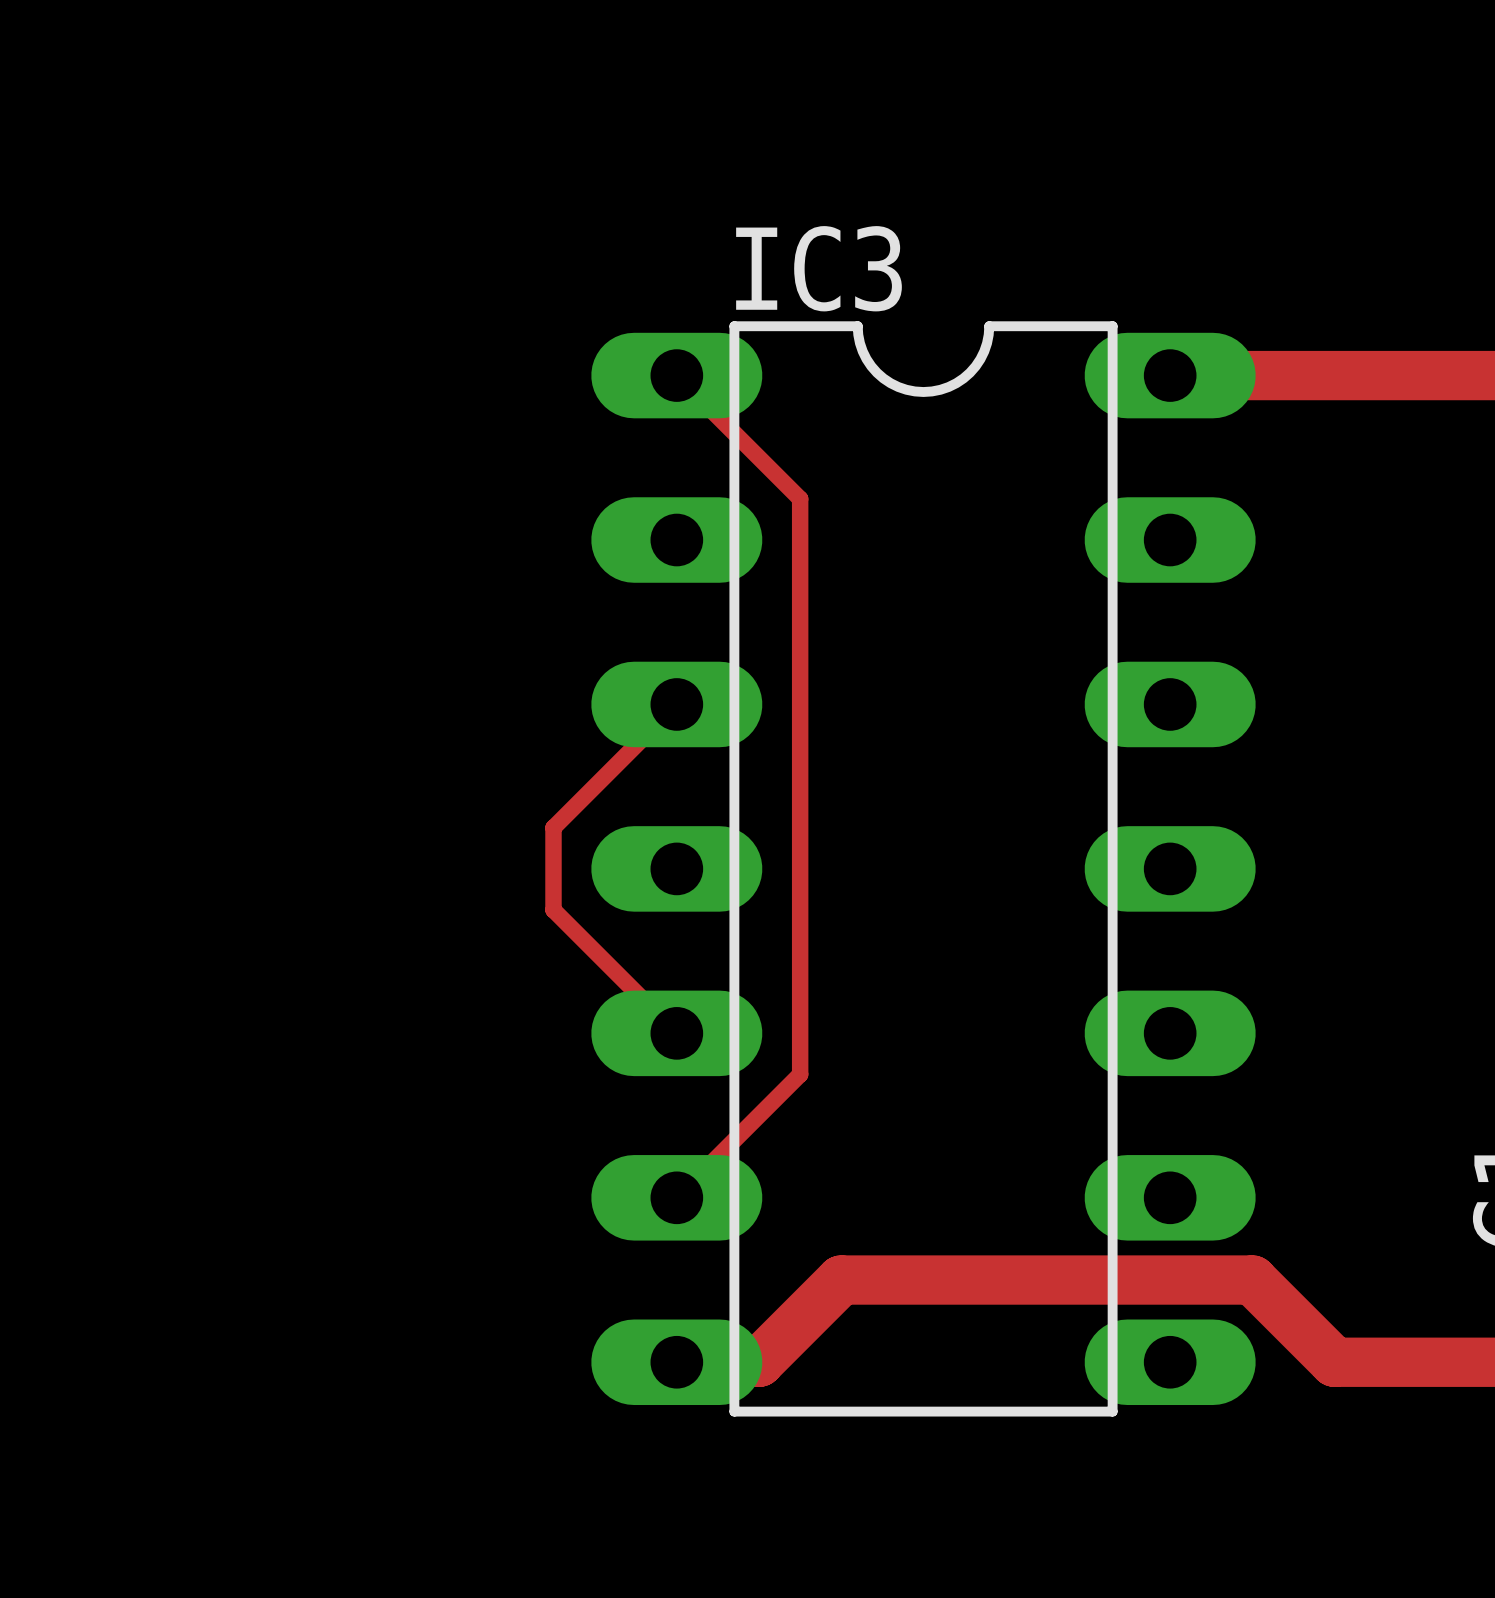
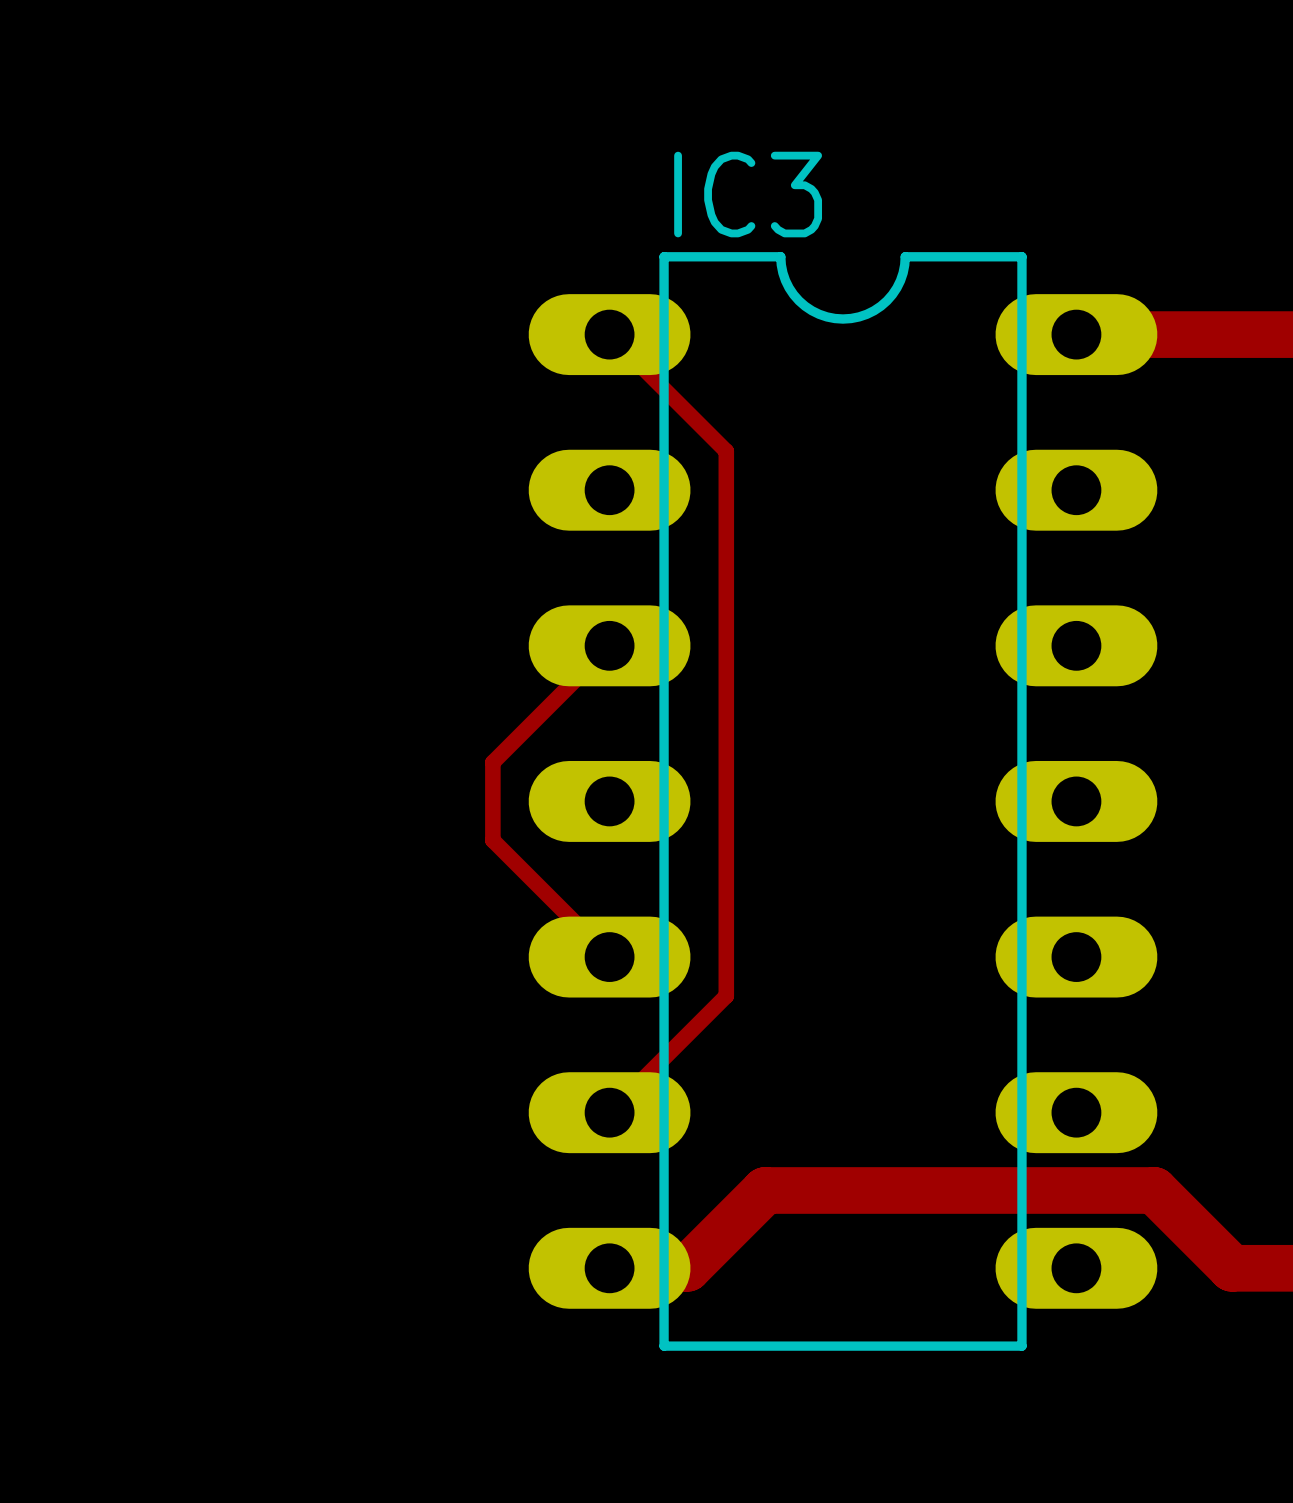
IC3 name position: IC3 (818, 268) -> IC3 (748, 194)
IC3 footprint: [591, 321, 1256, 1417] -> [528, 252, 1158, 1351]

